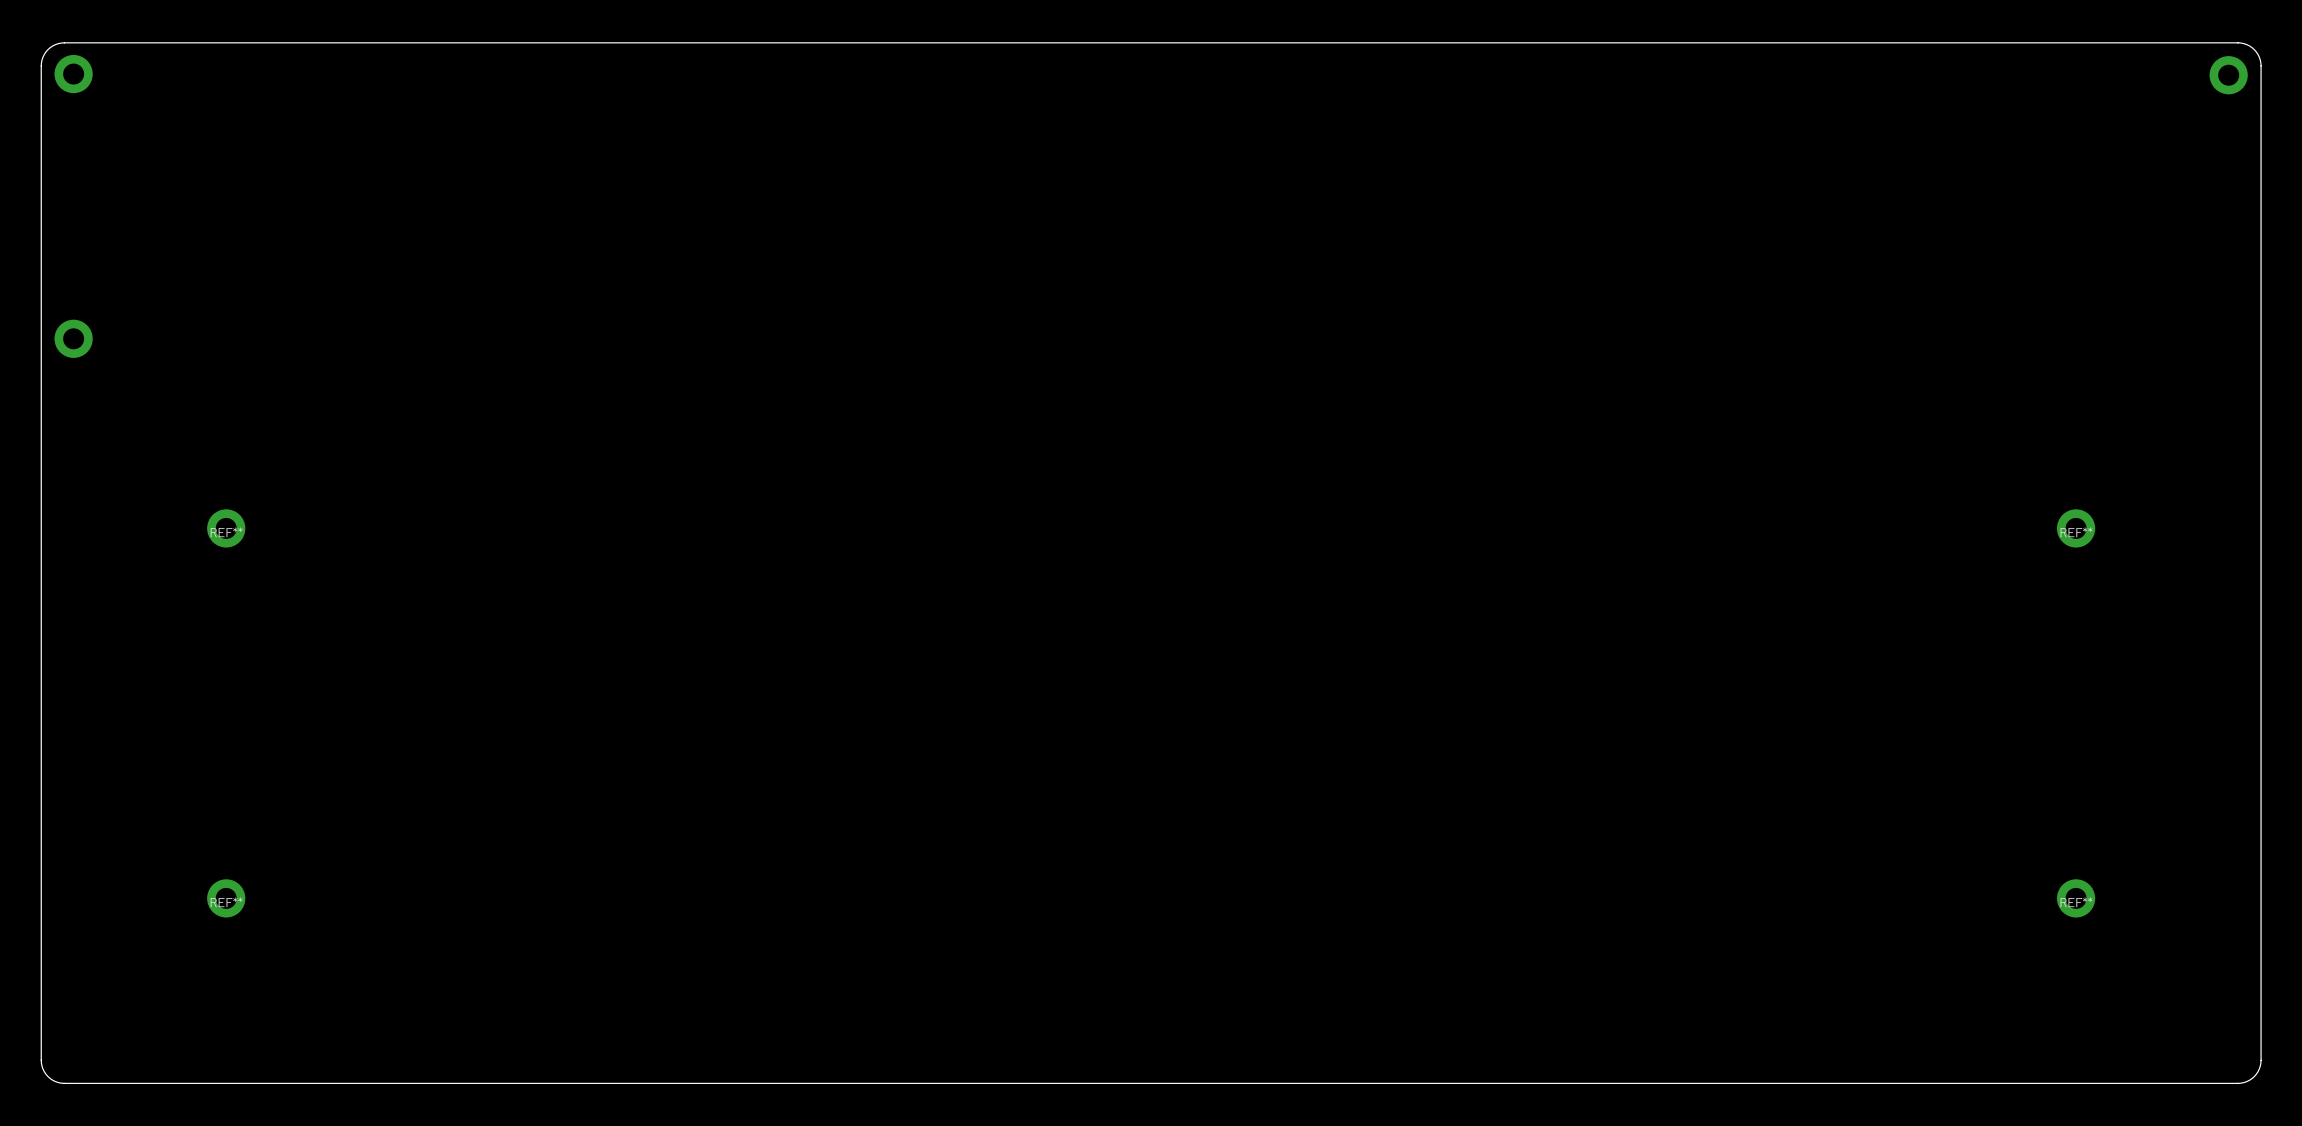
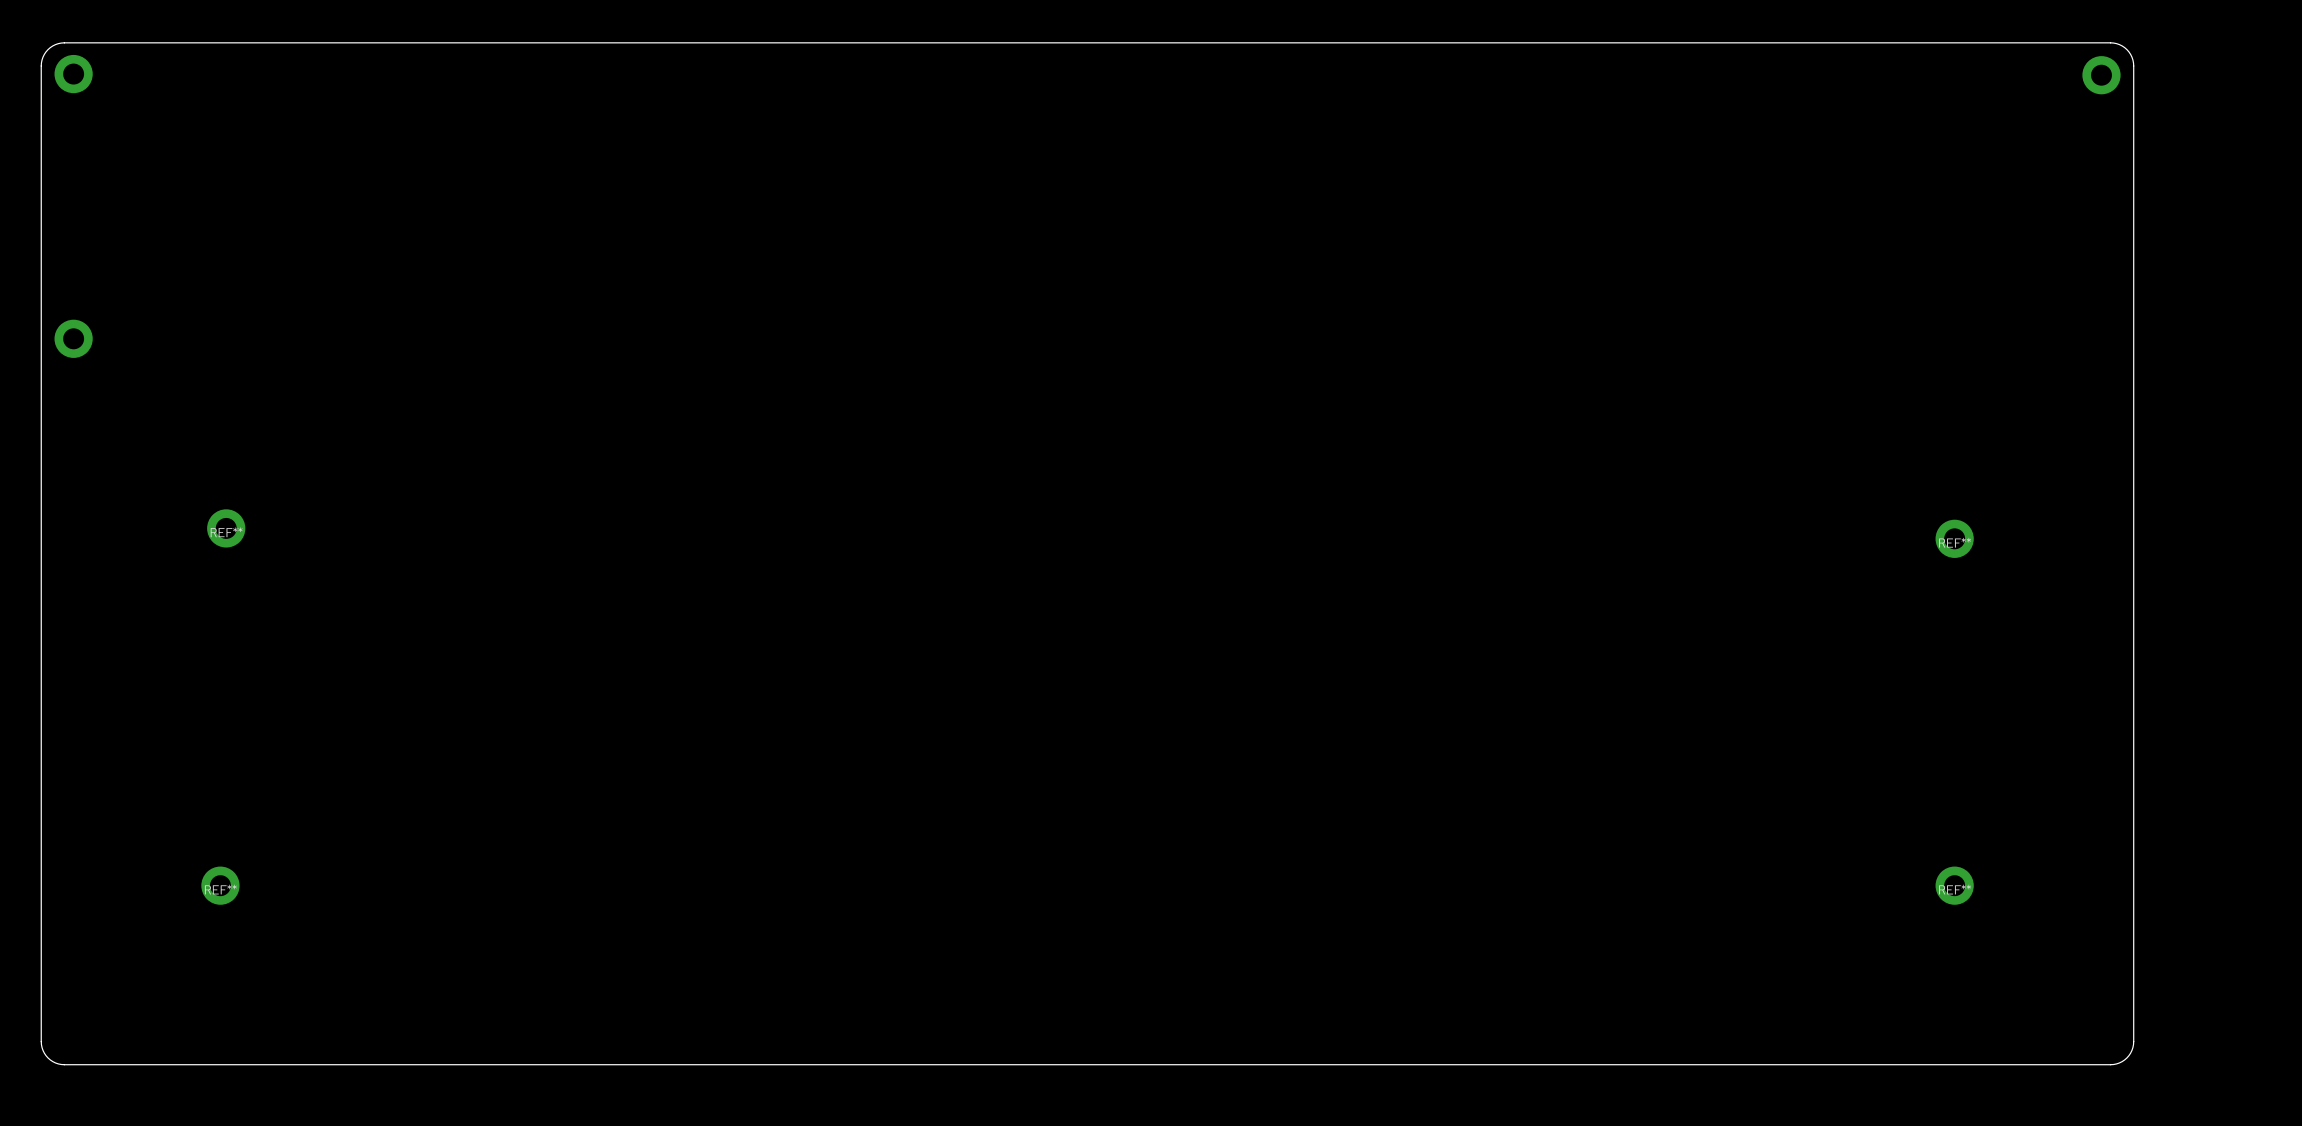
board edge: (2110, 42) (2240, 43) (2254, 49) (2260, 62) (2261, 1060) (2257, 1071) (2246, 1081) (2237, 1083) (64, 1083) (52, 1080) (44, 1071) (41, 1063) (41, 1041) -> (2110, 42) (2119, 44) (2126, 49) (2131, 57) (2133, 65) (2133, 1041) (2130, 1053) (2119, 1062) (2110, 1064) (64, 1064) (55, 1062) (48, 1057) (43, 1050) (41, 1041)
part position: (2228, 75) -> (2101, 75)
REF** position: (2076, 528) -> (1954, 538)
REF** position: (226, 898) -> (220, 885)
REF** position: (2076, 898) -> (1954, 885)

